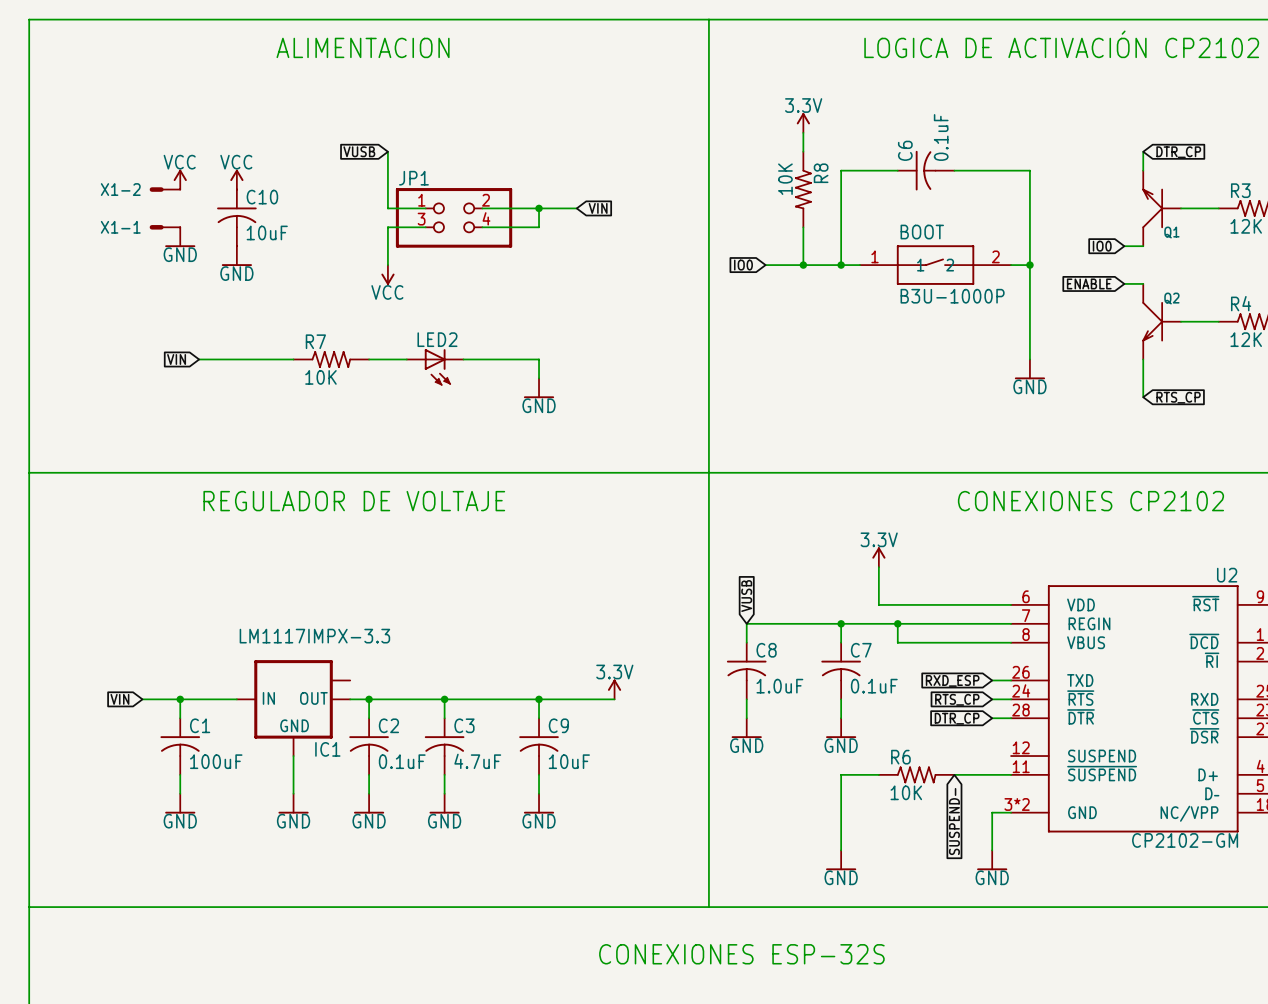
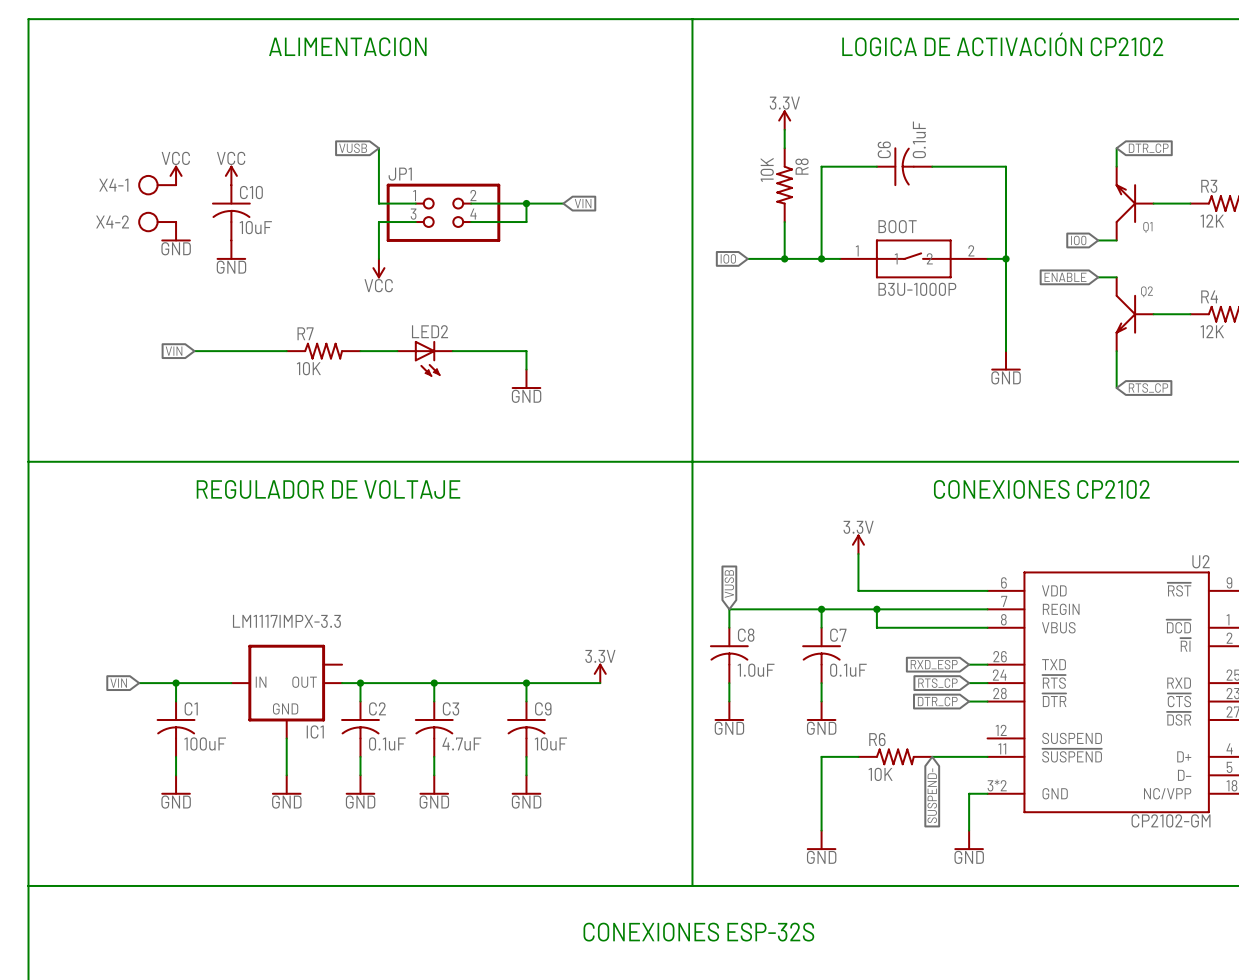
X4-1: none -> (157, 185)
X1-2: (164, 189) -> none
X4-2: none -> (157, 222)
X1-1: (164, 227) -> none

